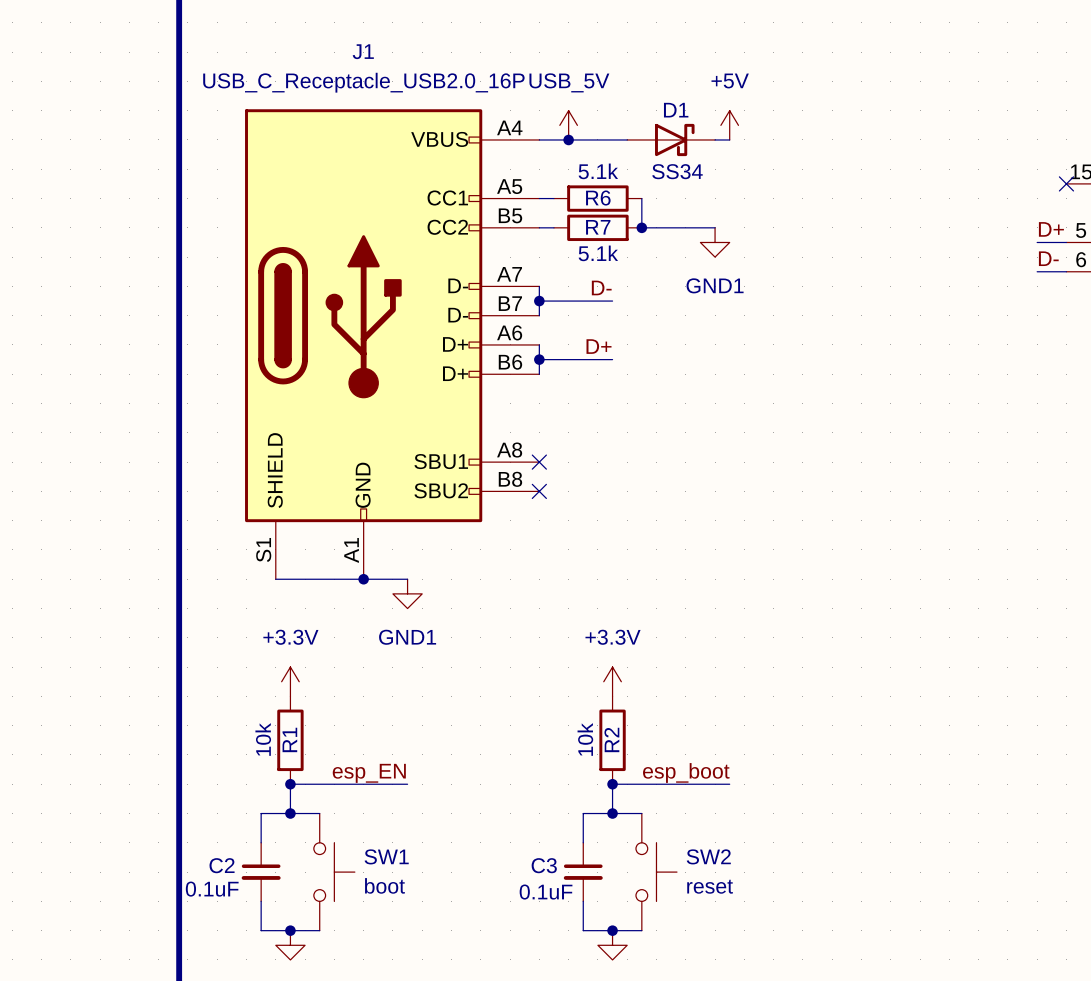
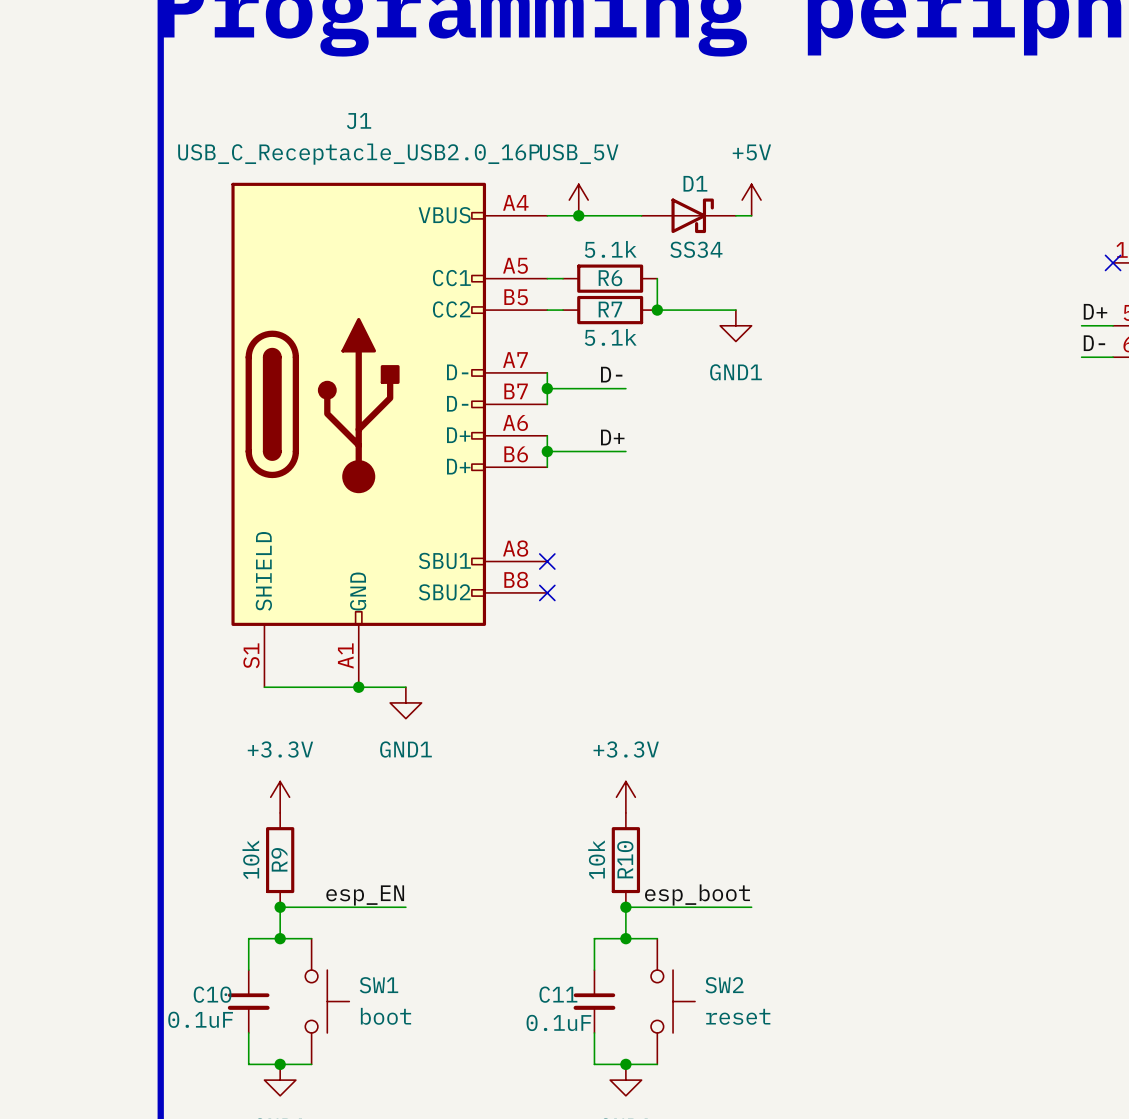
R1 name: R1 (289, 739) -> R9 (279, 859)
R2 name: R2 (611, 739) -> R10 (625, 859)
C2 name: C2 (222, 865) -> C10 (212, 994)
C3 name: C3 (544, 865) -> C11 (558, 994)

